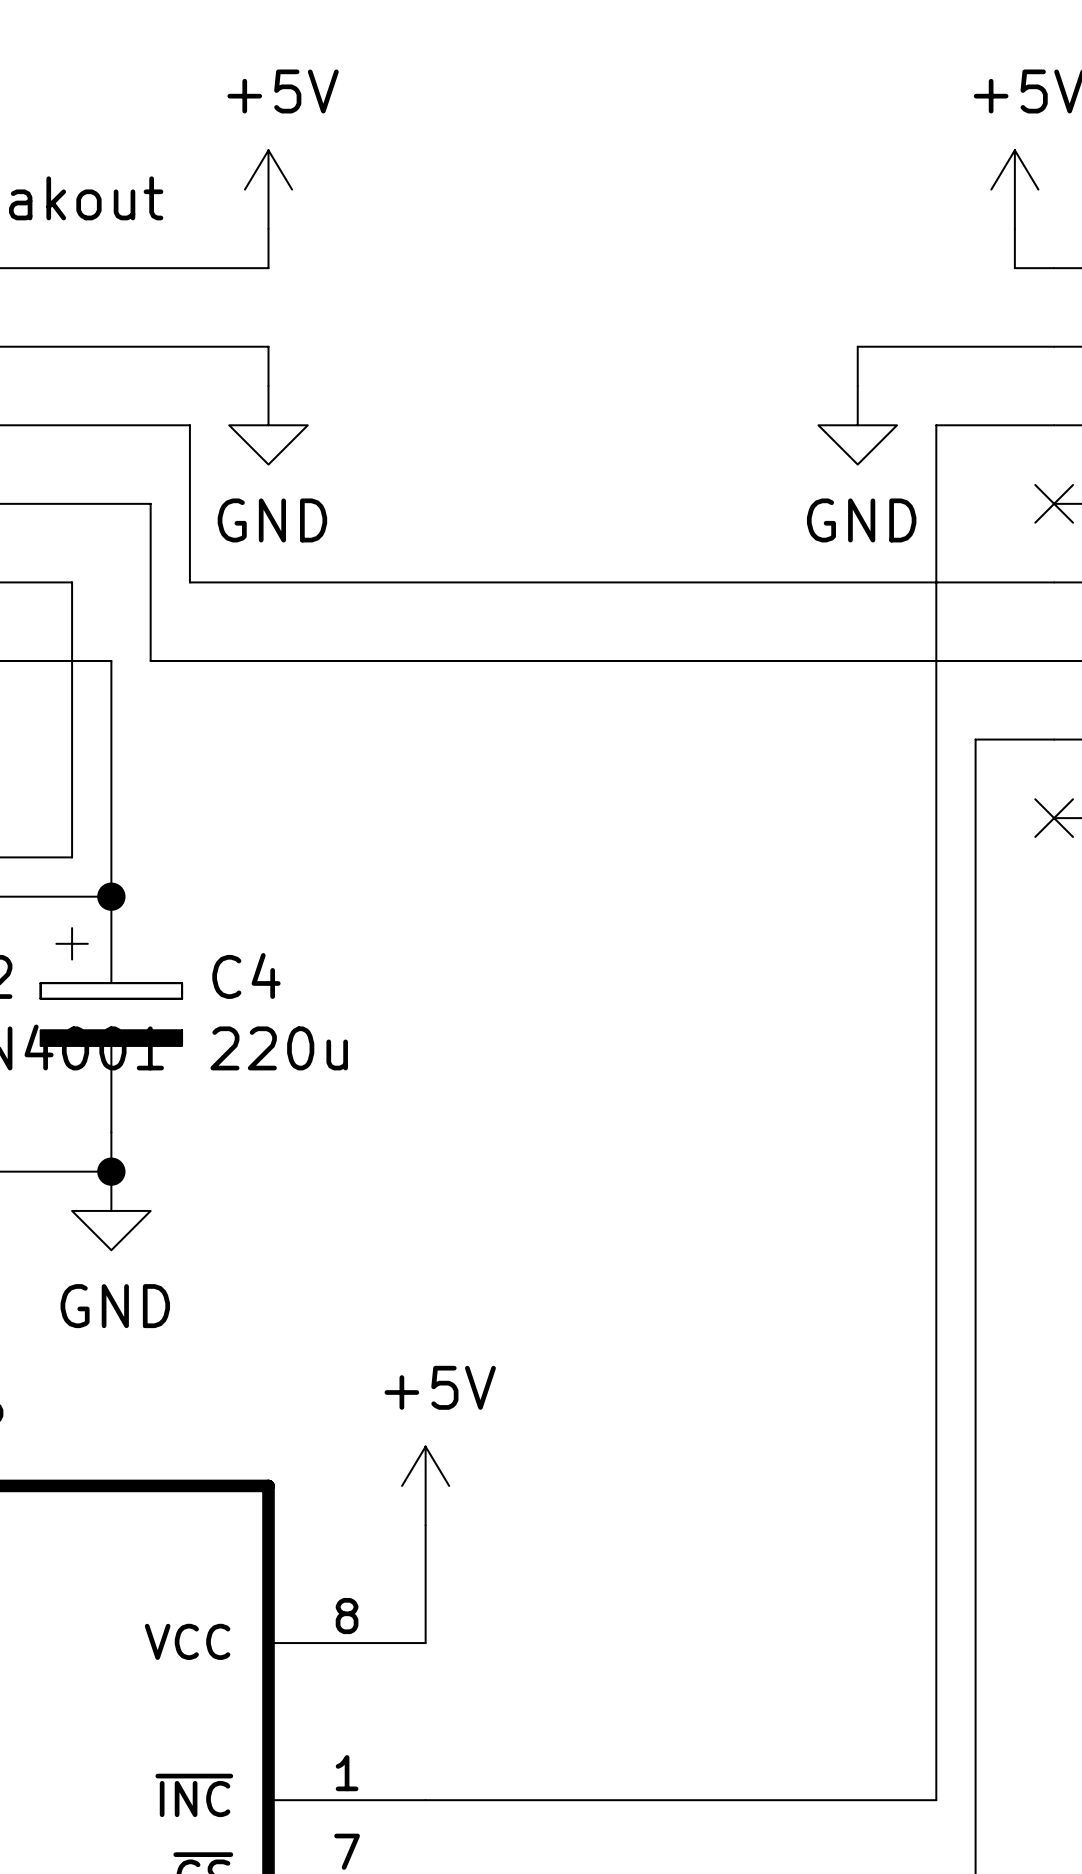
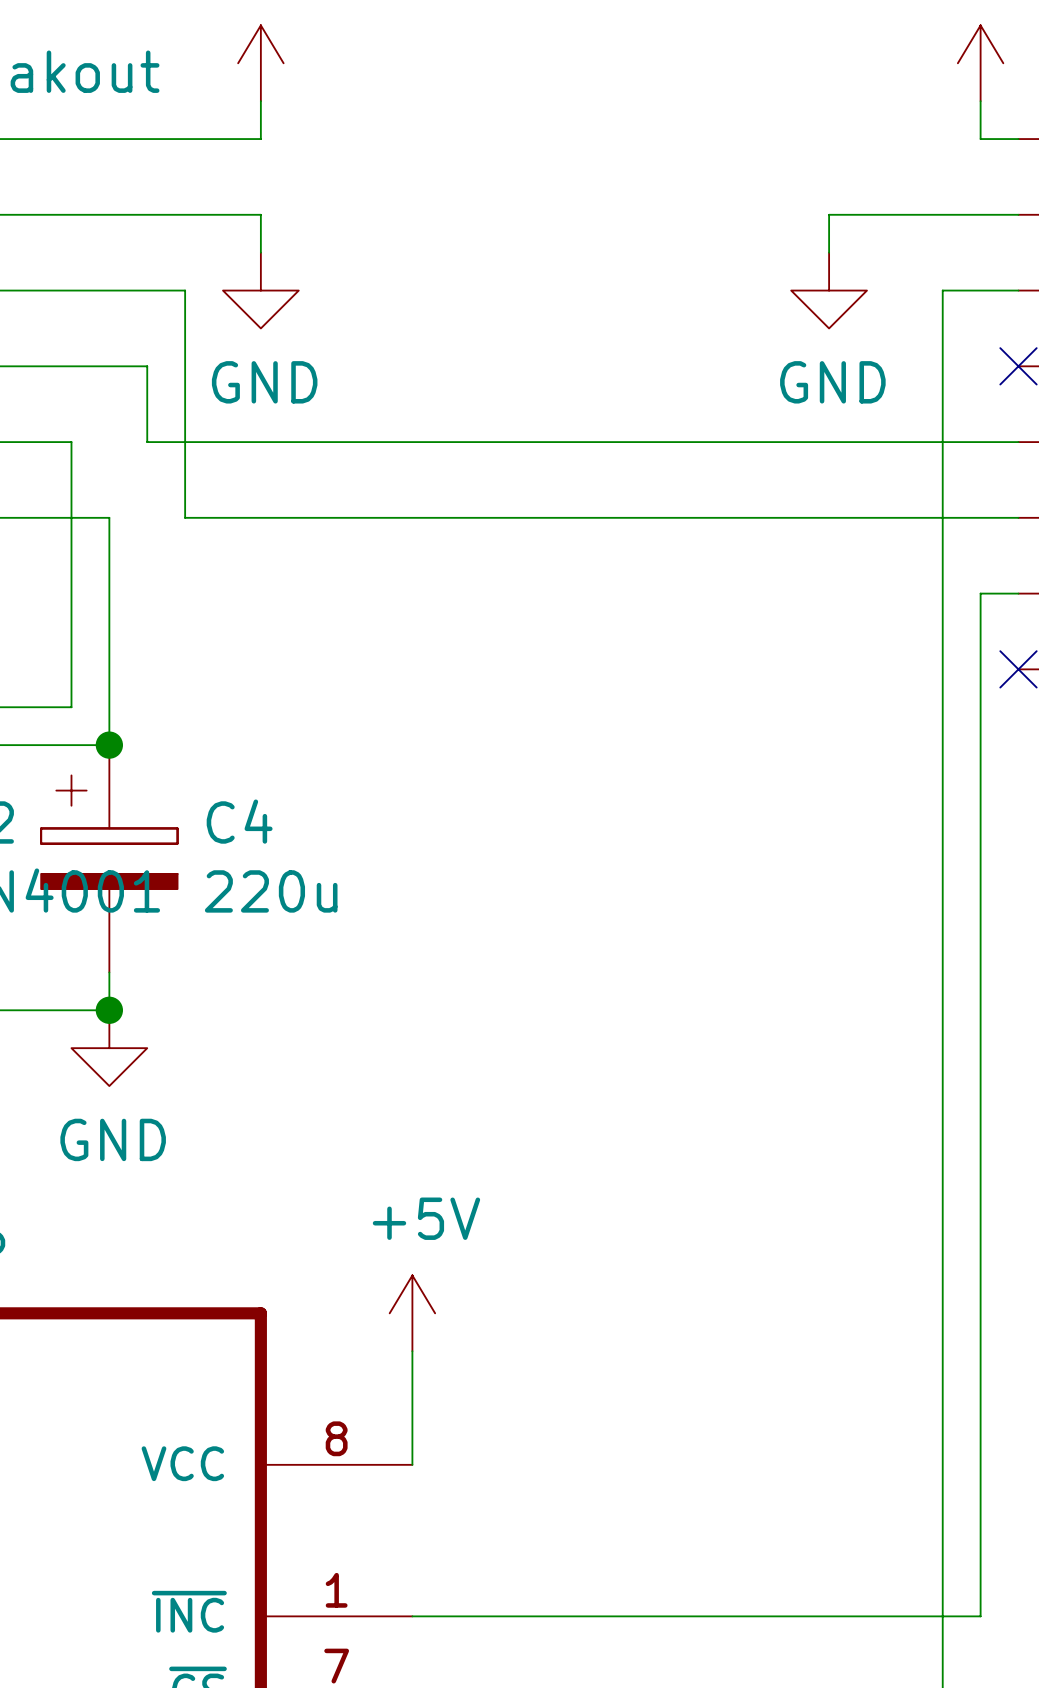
wire: (975, 425) (936, 425) (936, 1800) -> (980, 593) (980, 1616) (904, 1616)
wire: (150, 582) (150, 660) (189, 660) -> (147, 442) (185, 442) (185, 517)
wire: (975, 739) (1014, 739) -> (942, 593) (942, 290)

